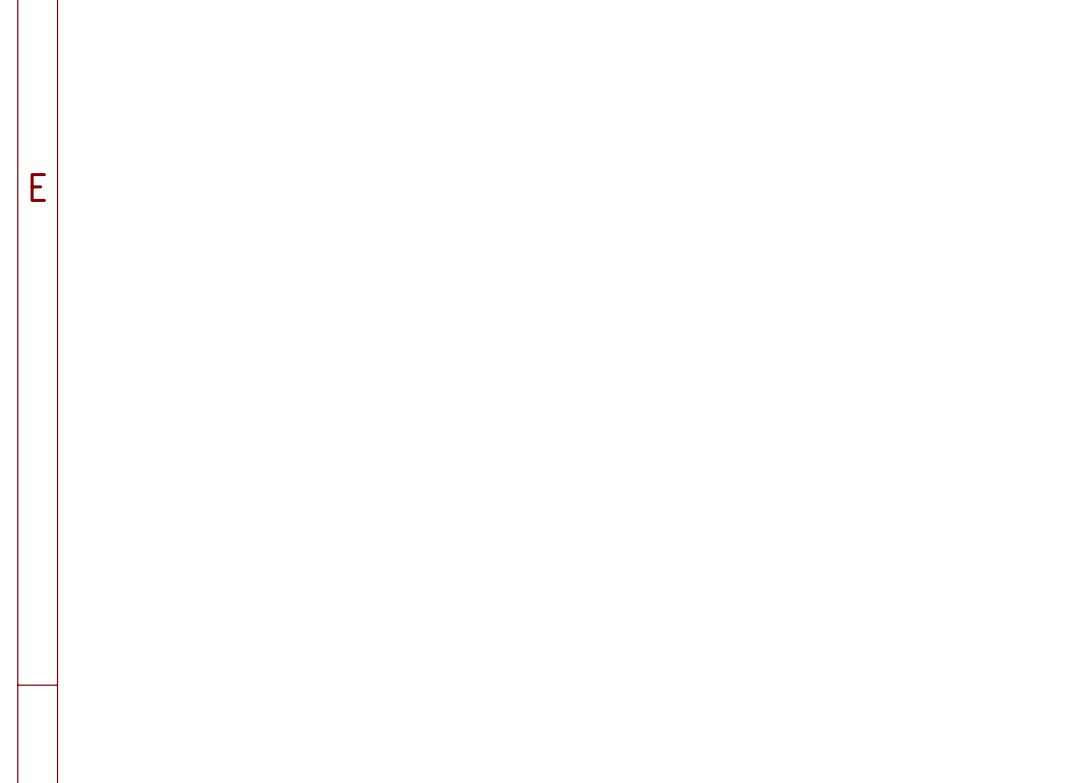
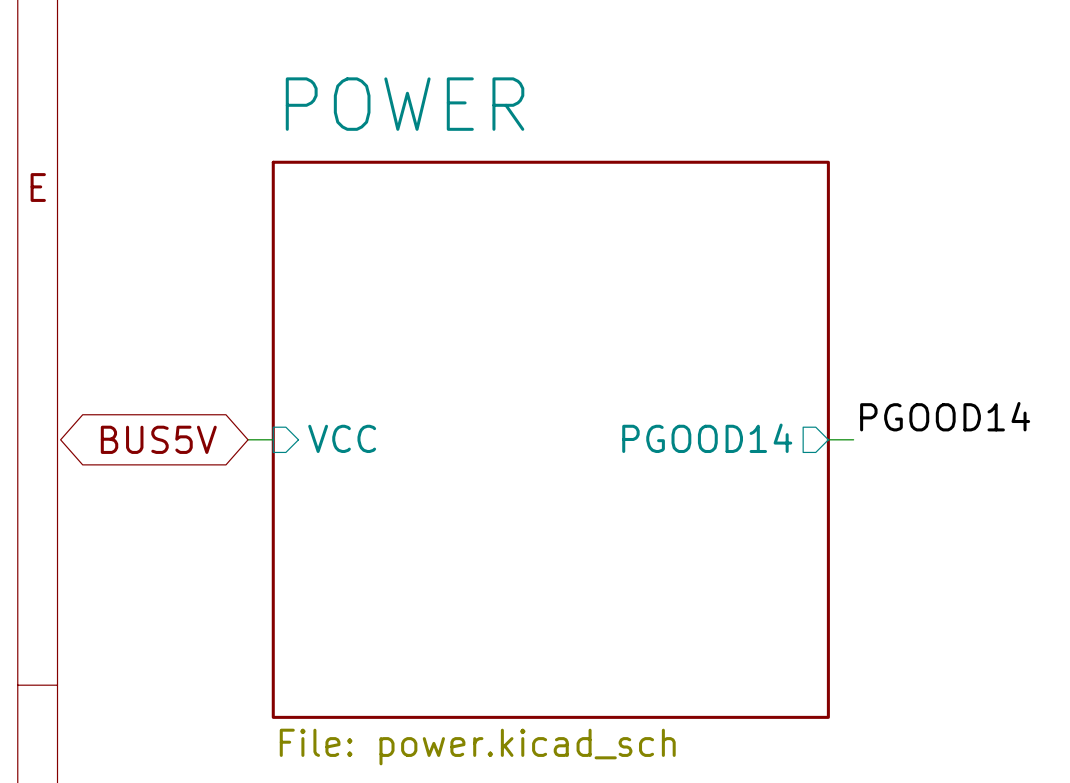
label: none -> PGOOD14 (945, 416)
sheet pin: none -> VCC (342, 438)
sheet pin: none -> PGOOD14 (707, 438)
global label: none -> BUS5V (158, 439)
wire: none -> (248, 439) (273, 439)
sheet POWER: none -> File: power.kicad_sch (550, 439)
wire: none -> (828, 439) (853, 439)

